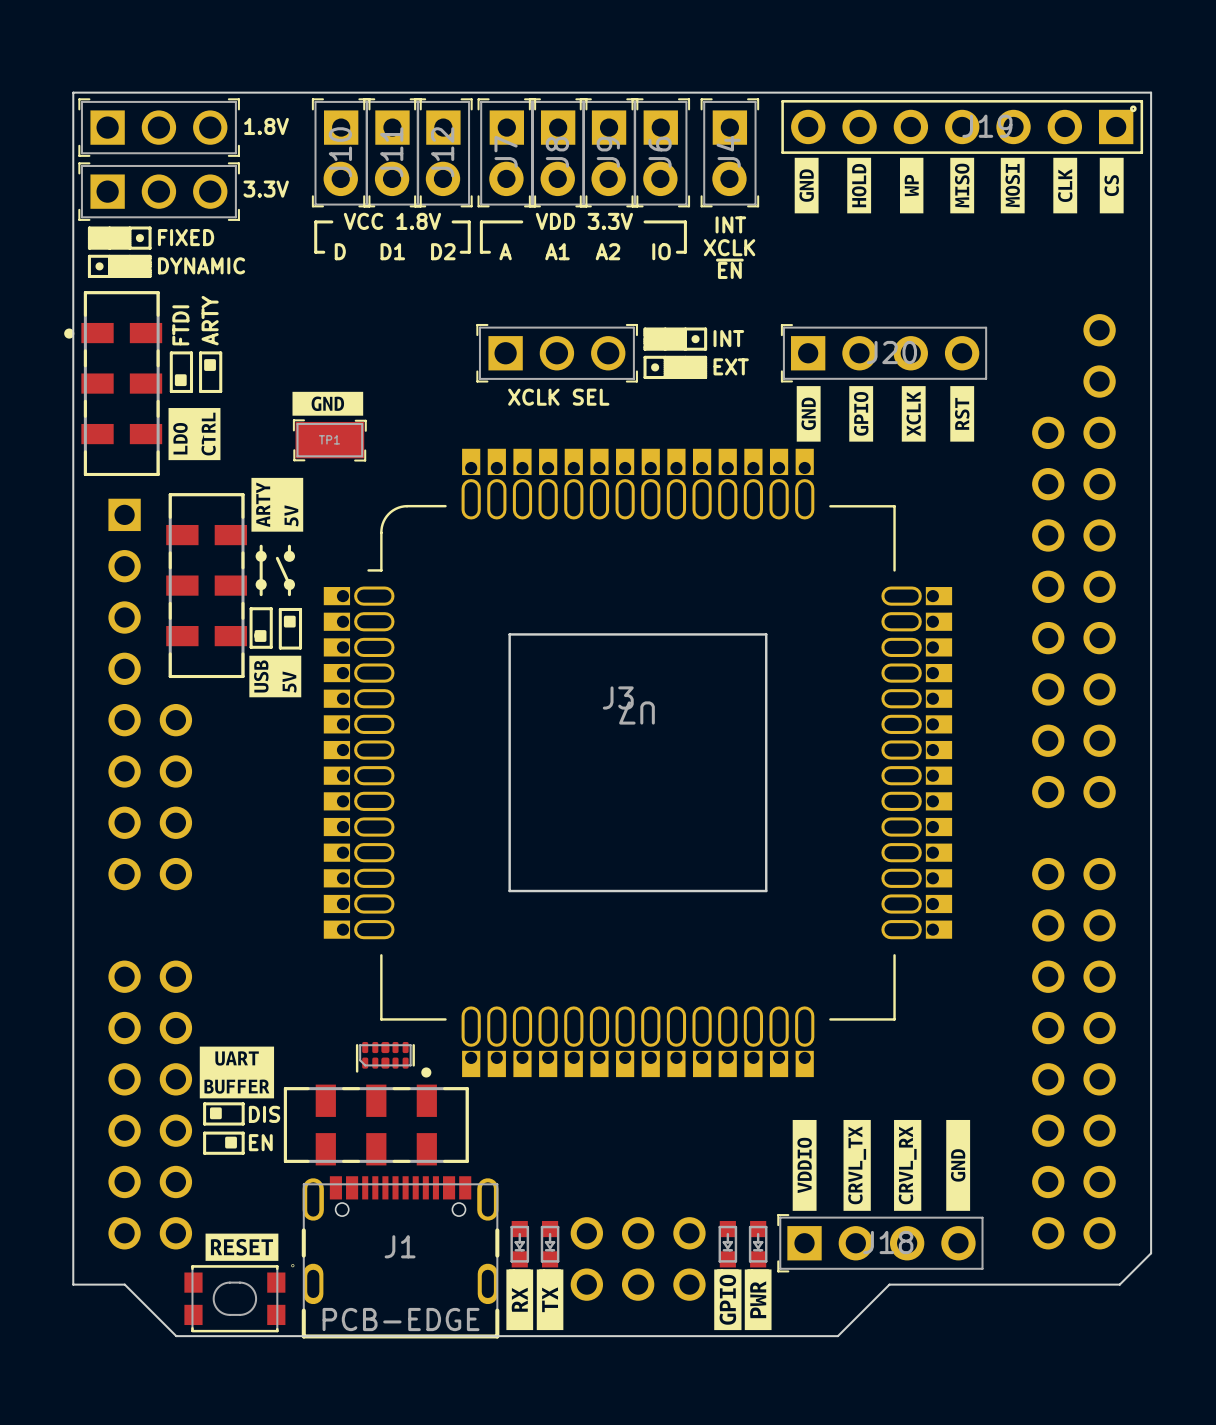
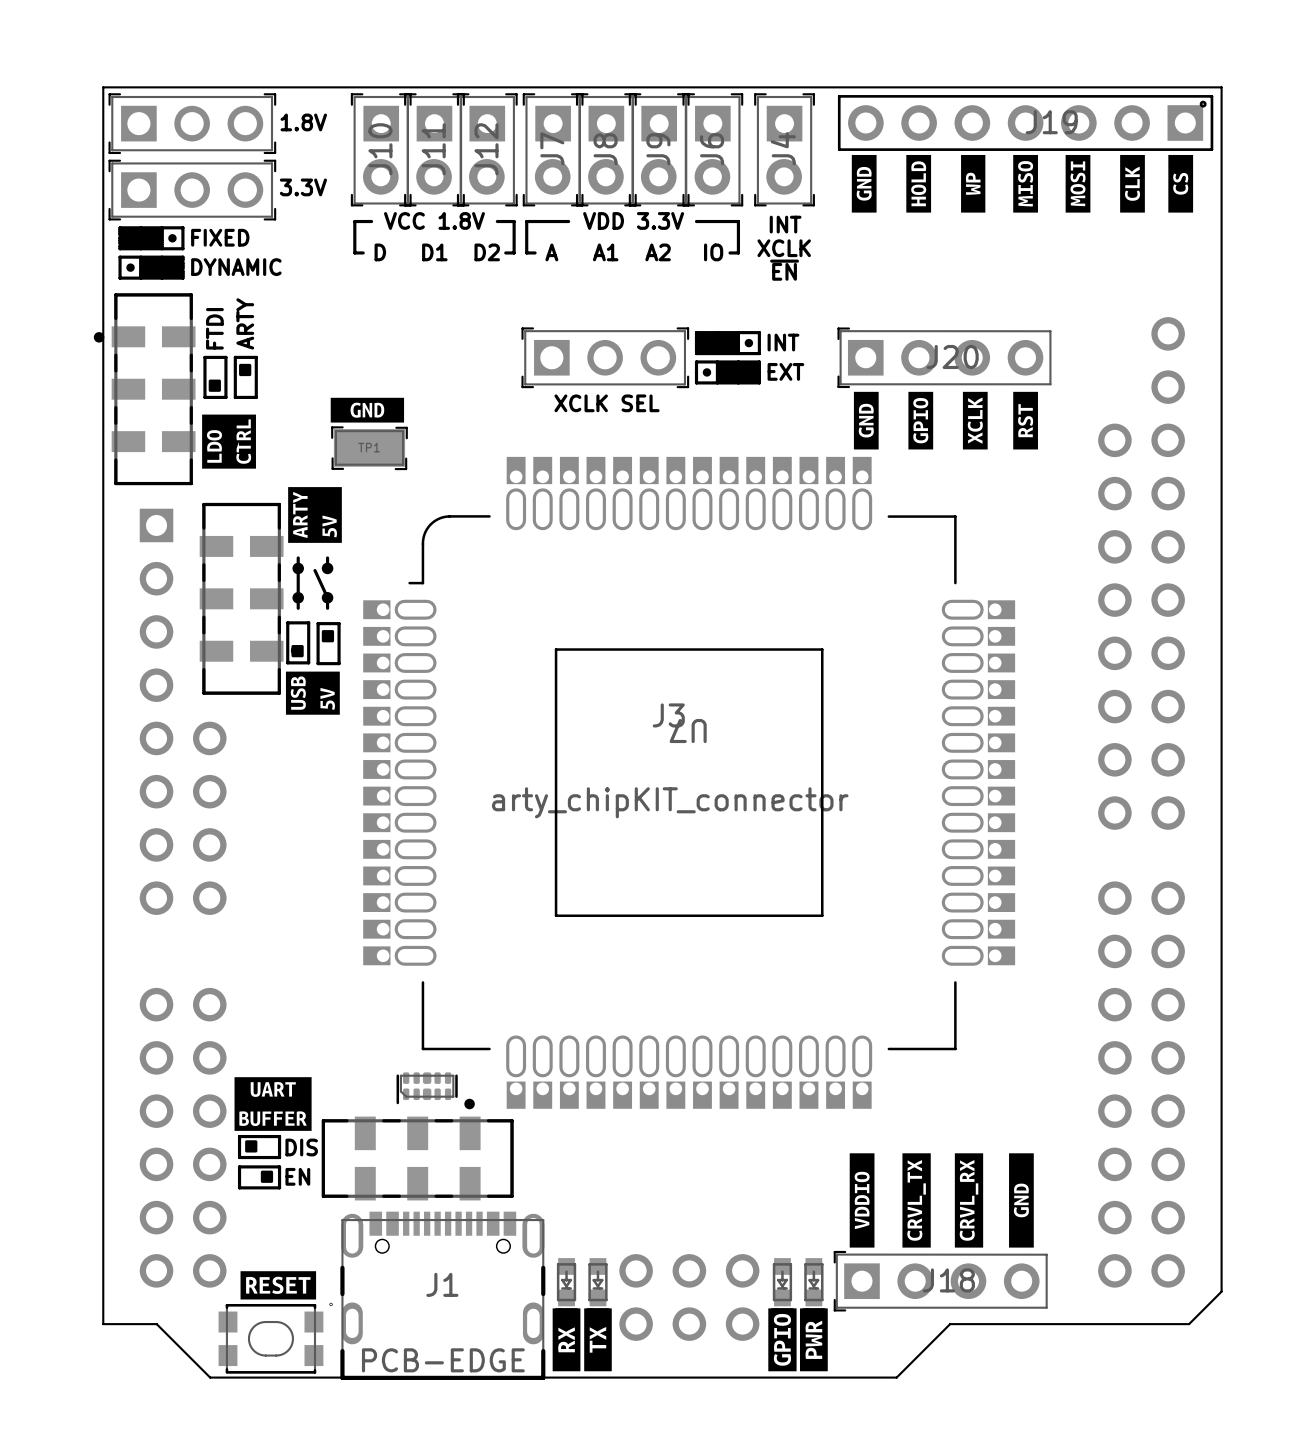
J3 value: none -> arty_chipKIT_connector (670, 802)

